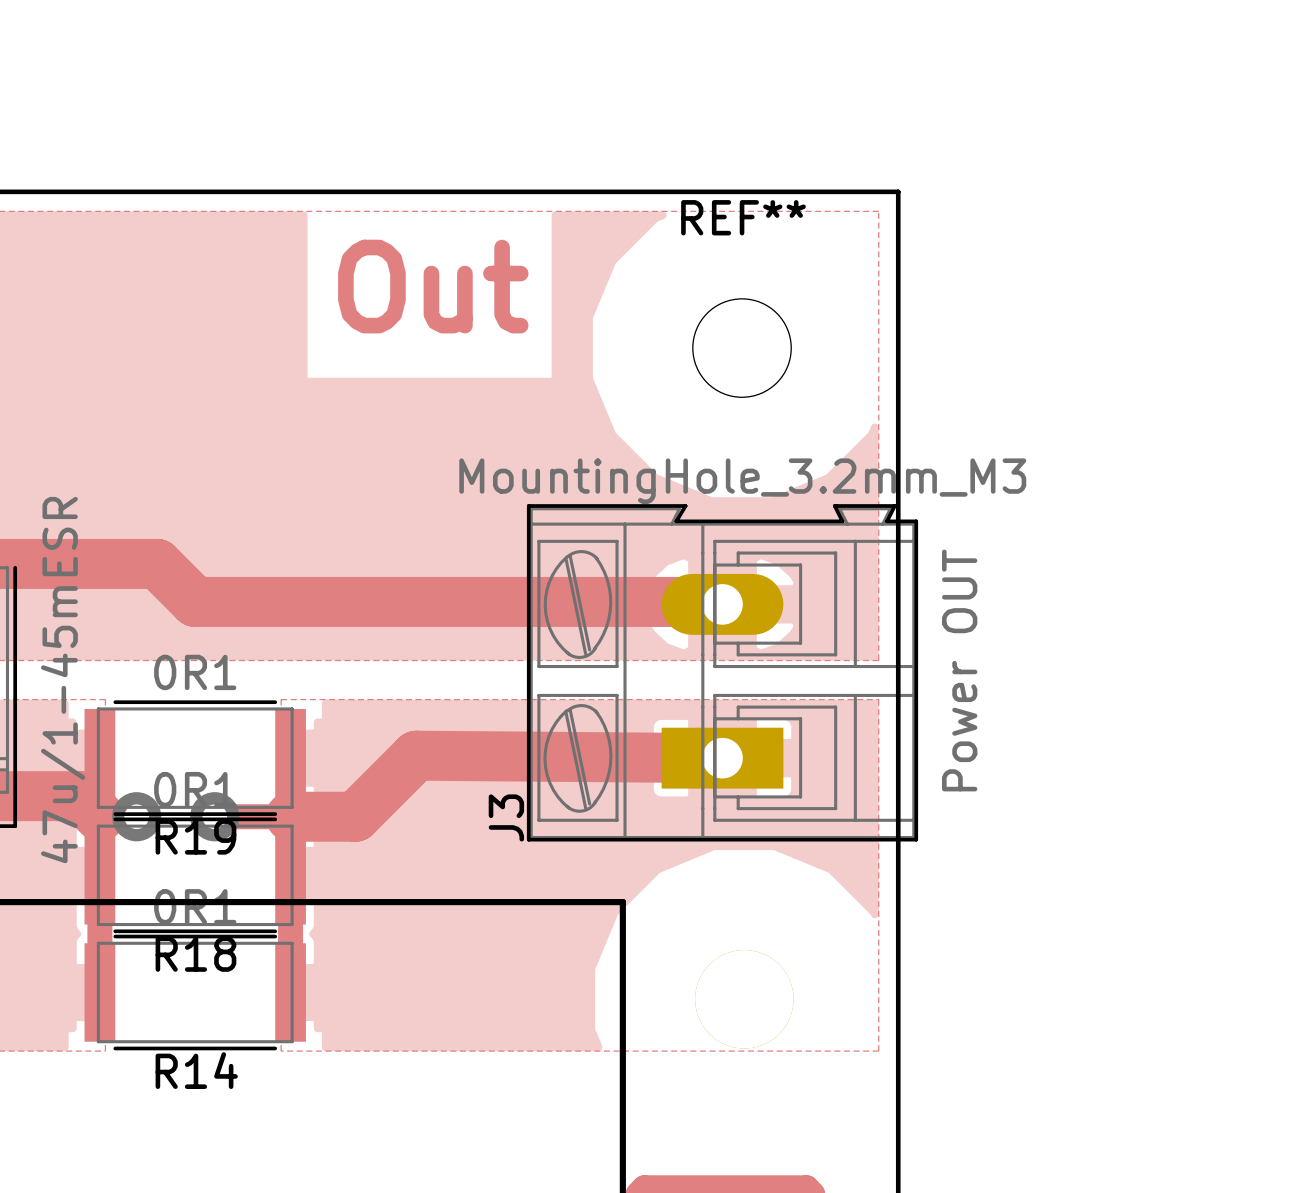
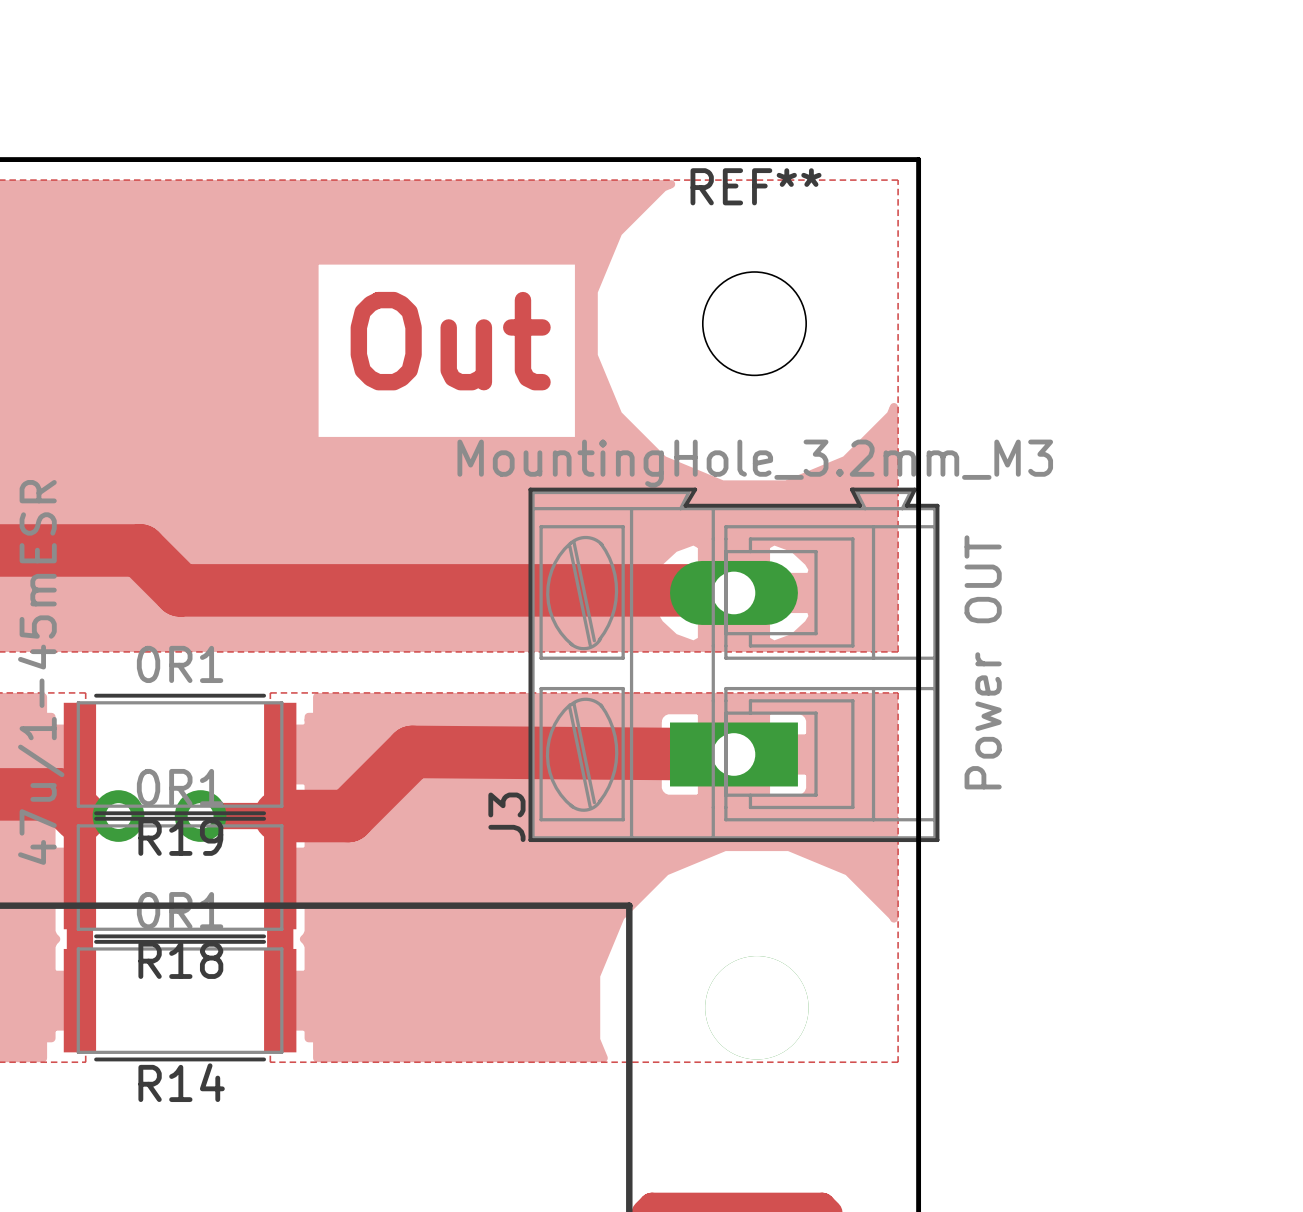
text position: Out (433, 286) -> Out (450, 341)

